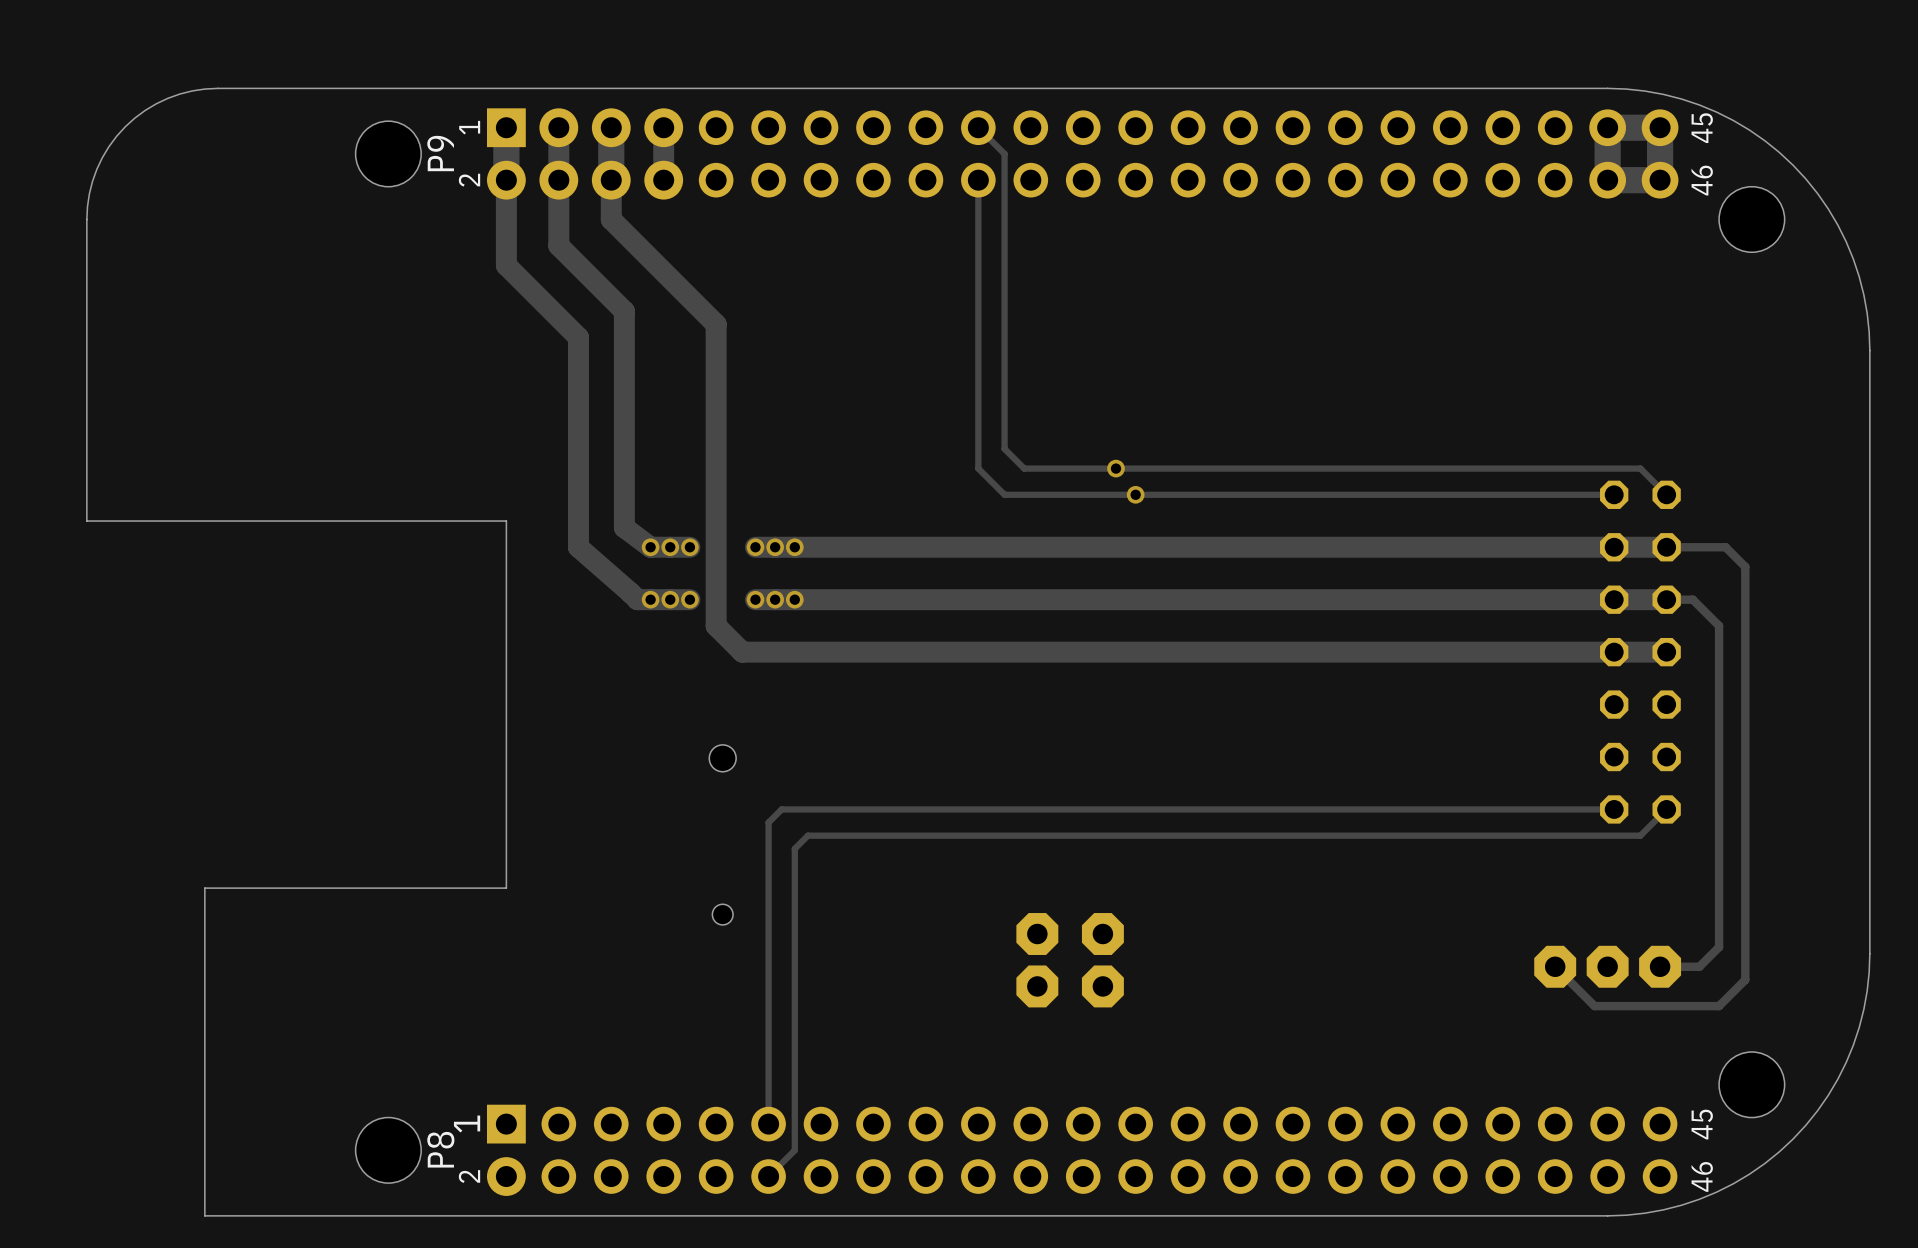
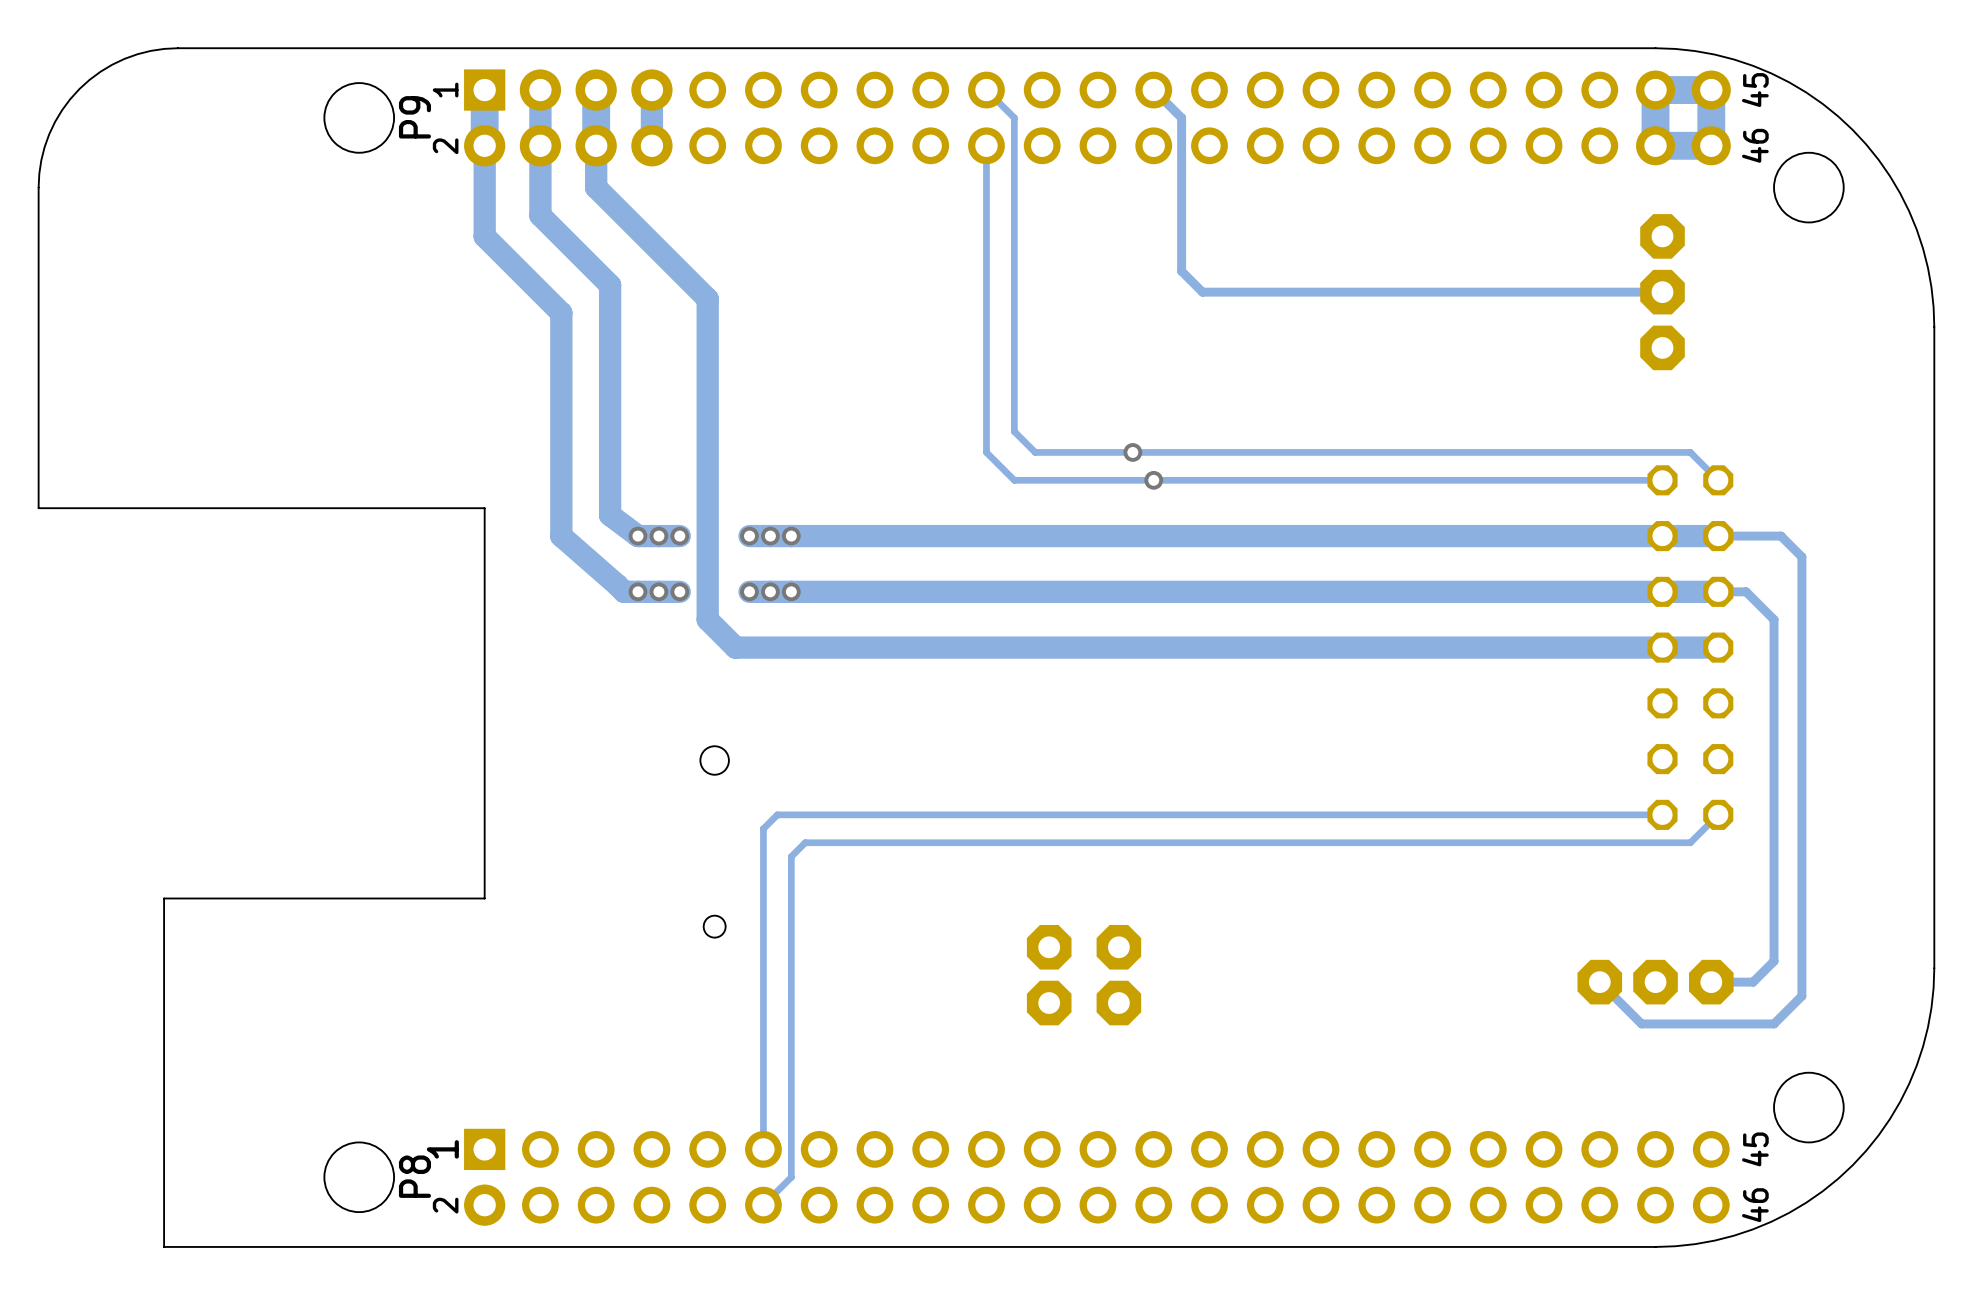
track: none -> (1153, 90) (1181, 117) (1181, 271) (1202, 292) (1662, 292)
part: none -> (1662, 292)

